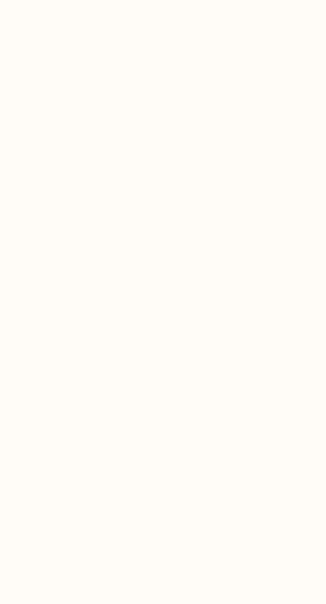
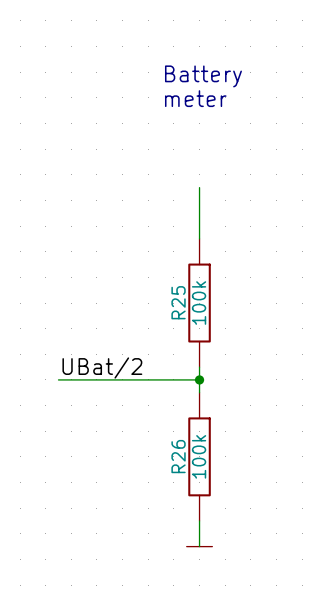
text: none -> Battery (203, 76)
text: none -> meter (195, 98)
wire: none -> (199, 187) (199, 238)
R25: none -> 100k (199, 303)
label: none -> UBat/2 (102, 367)
wire: none -> (199, 367) (199, 392)
wire: none -> (58, 379) (199, 379)
junction: none -> (199, 379)
R26: none -> 100k (199, 456)
wire: none -> (199, 520) (199, 546)
power symbol: none -> (199, 546)

